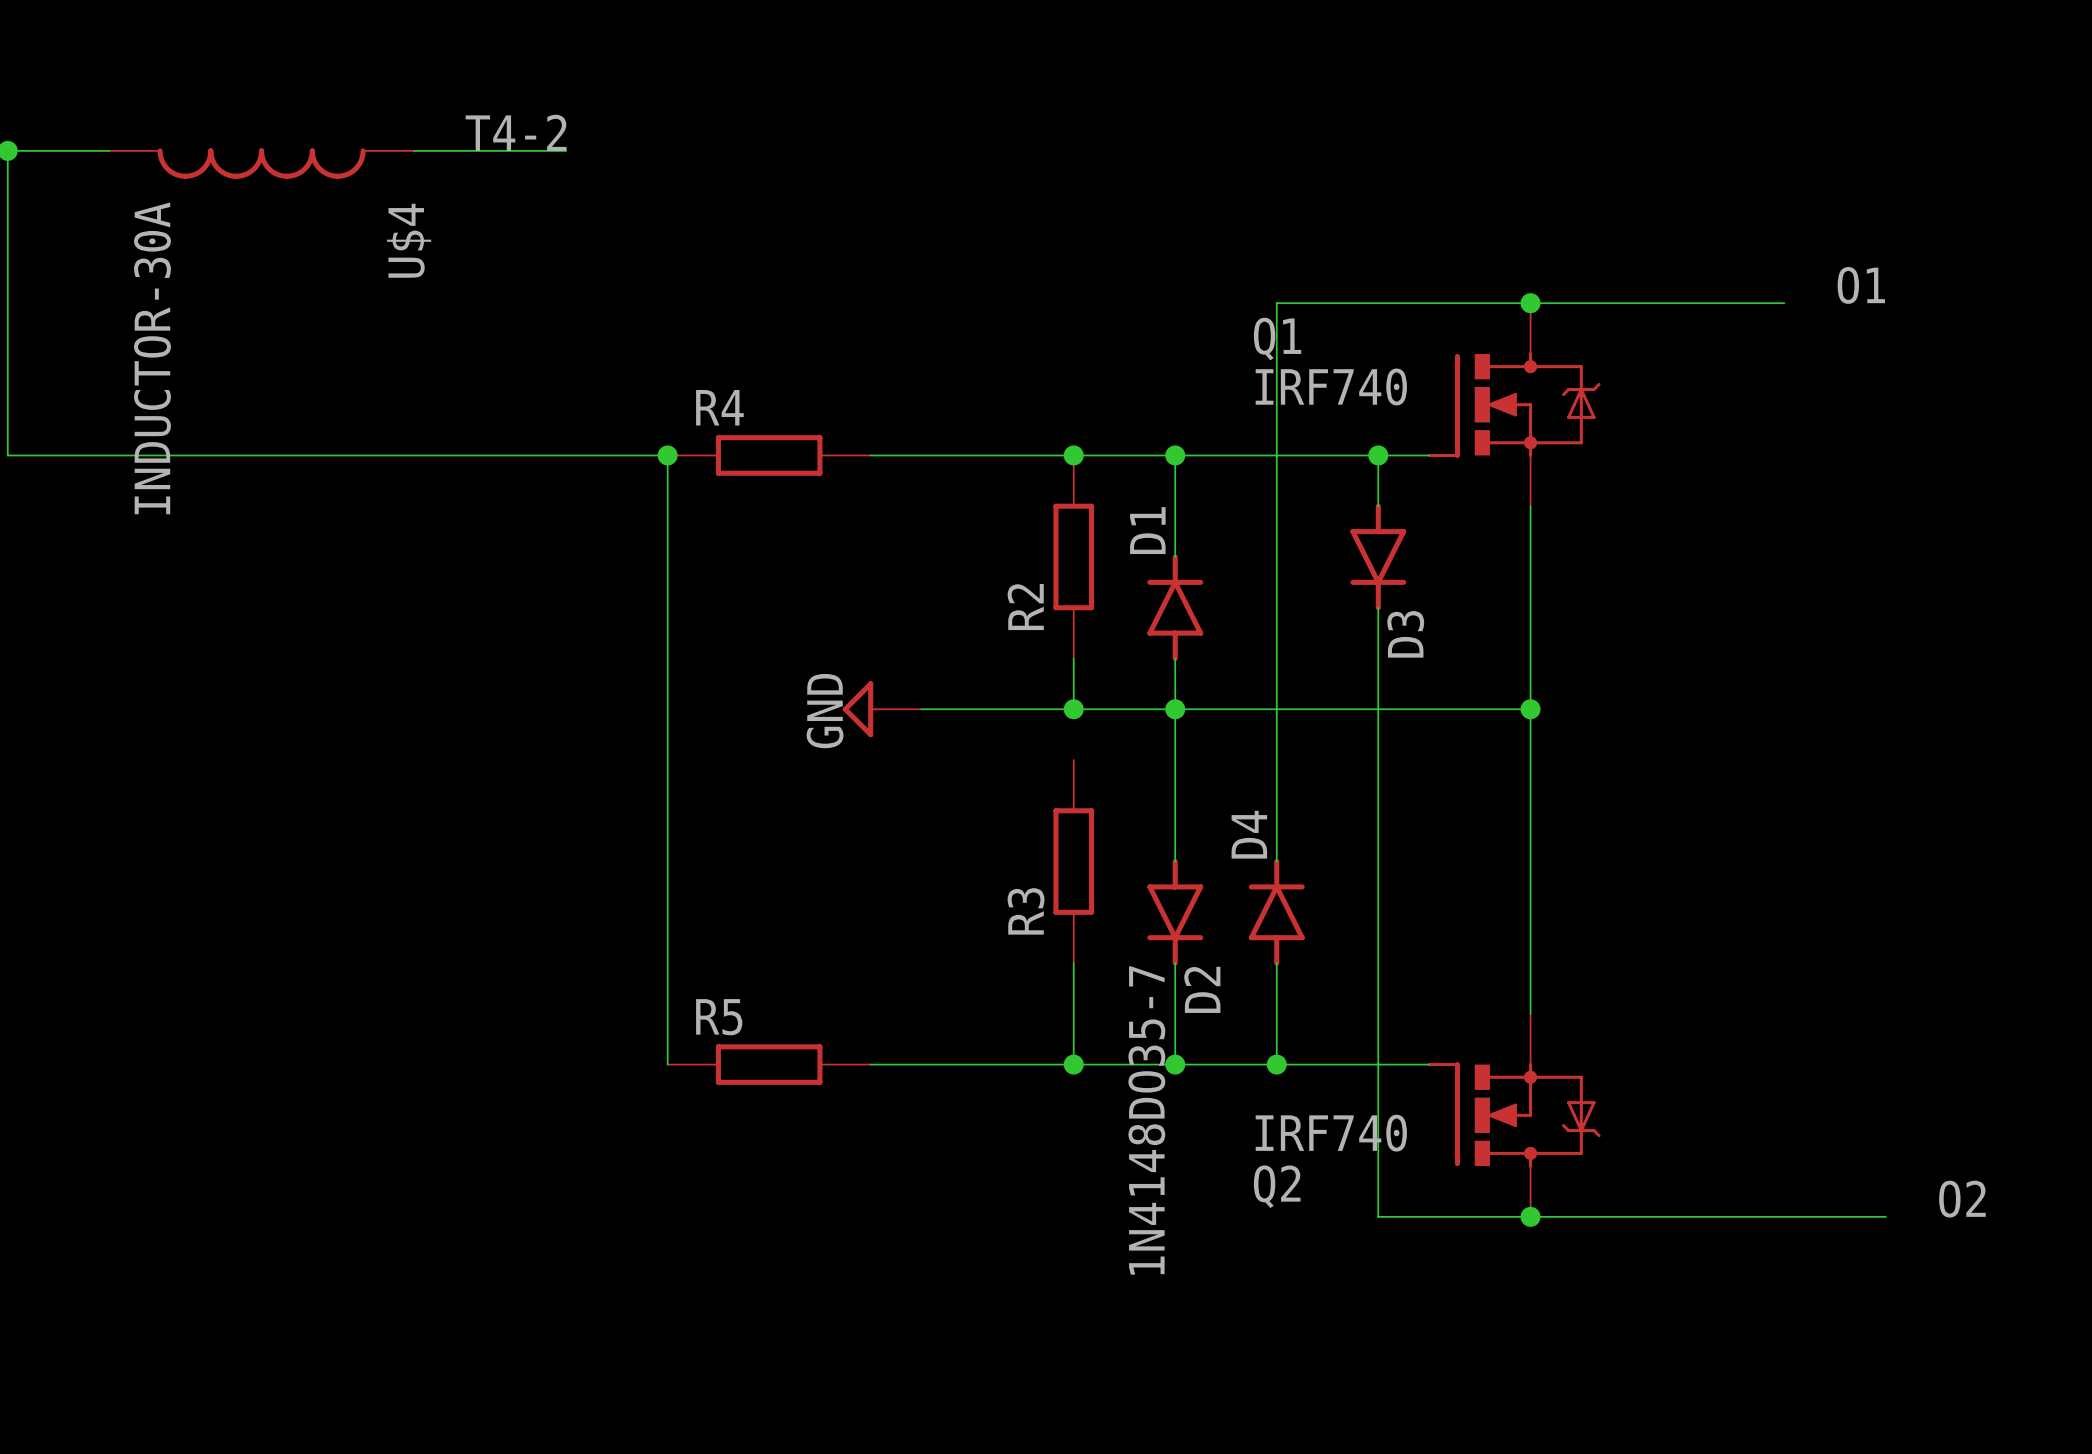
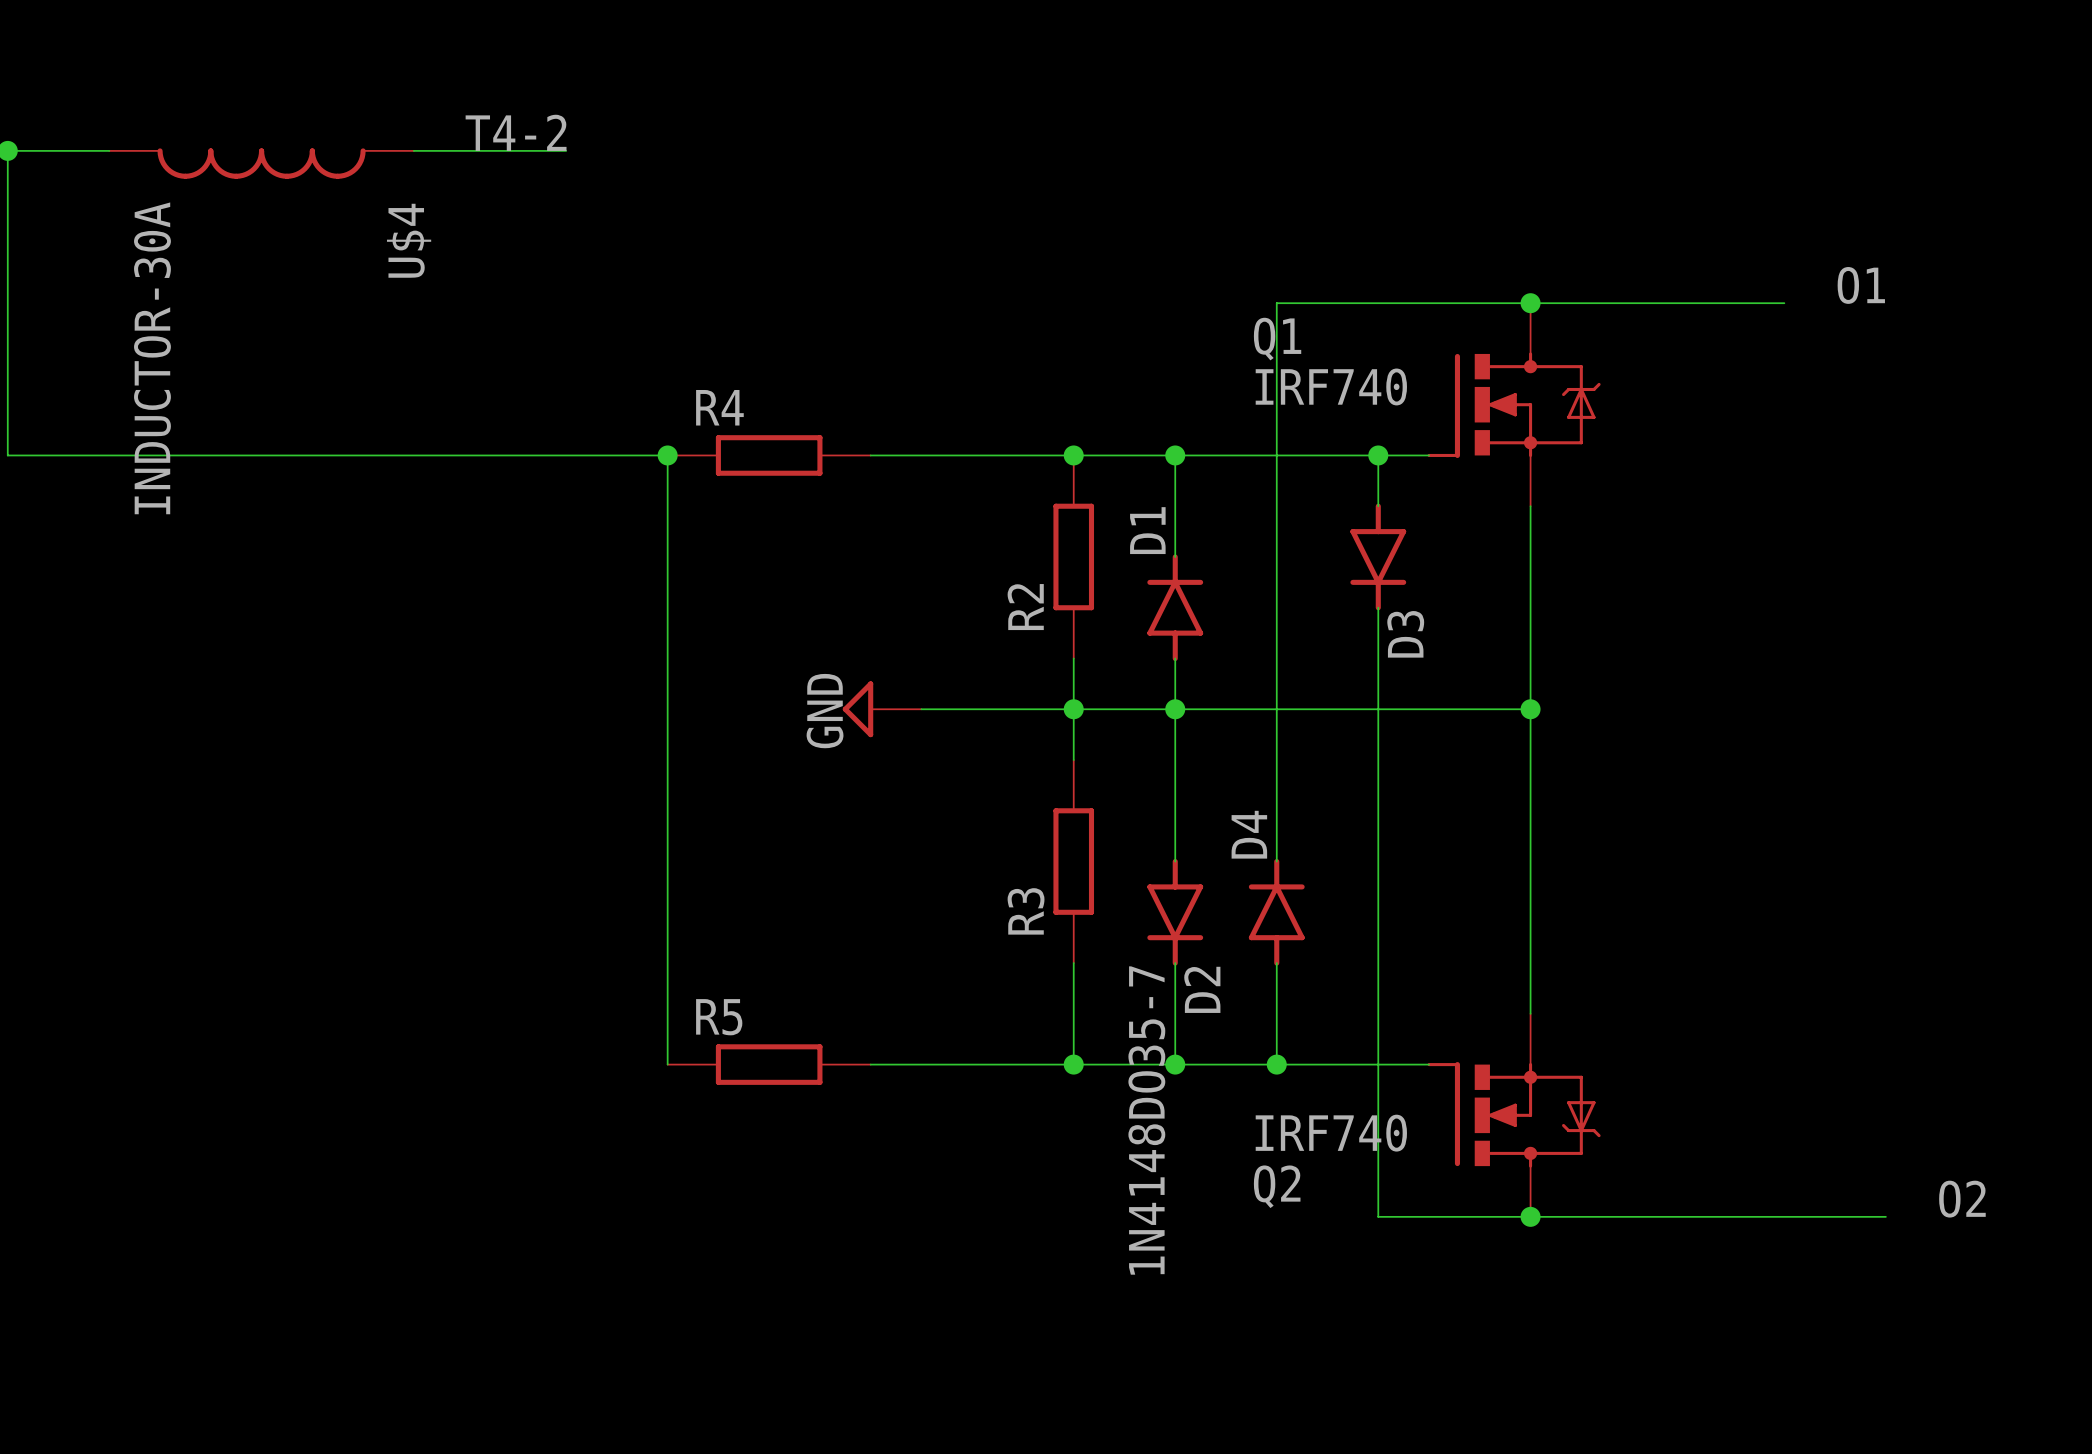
wire: none -> (1073, 709) (1073, 760)

